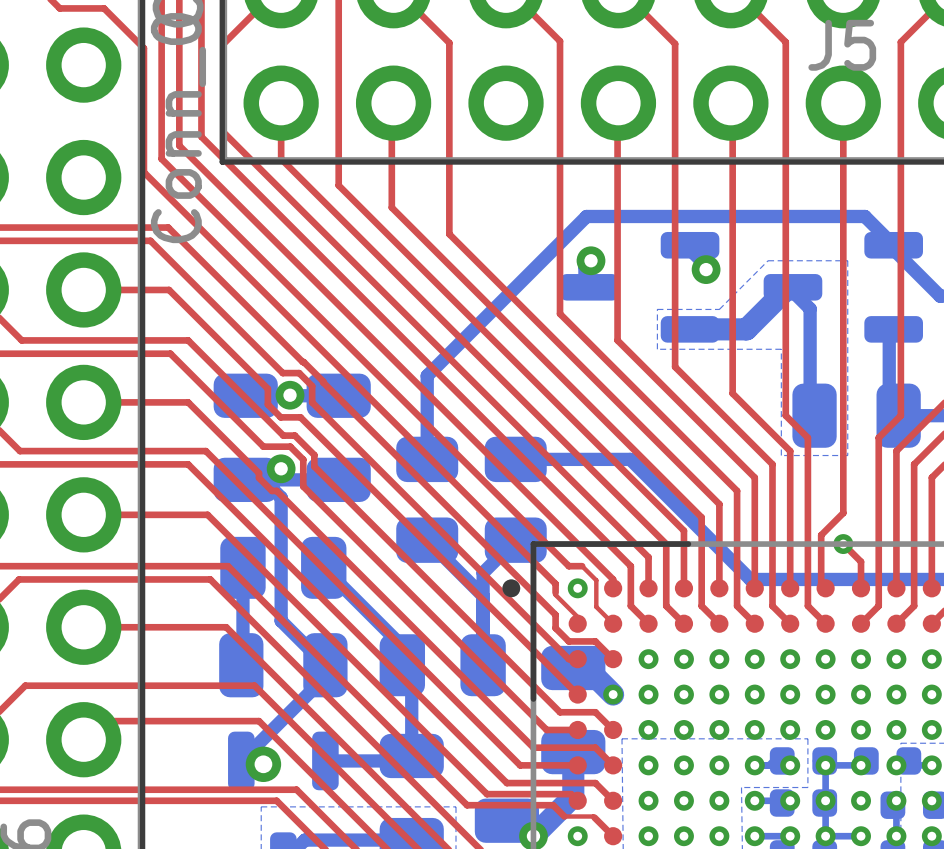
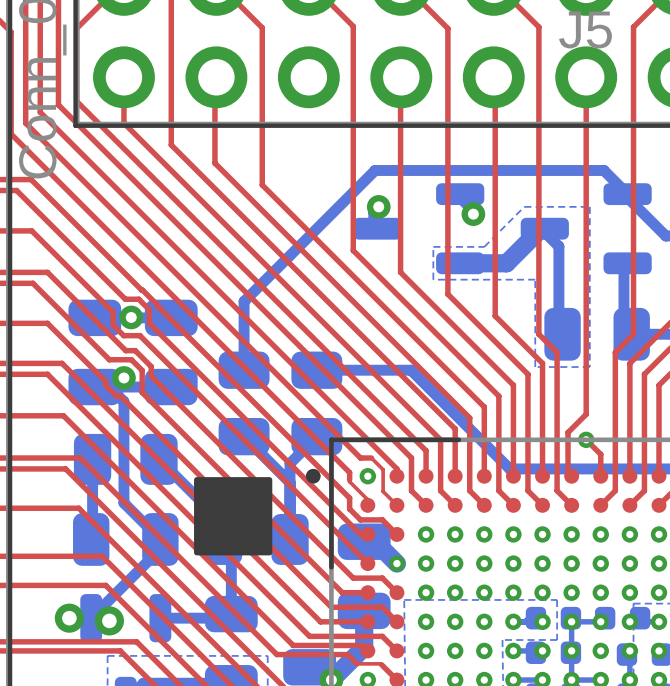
drawing: none -> [194, 477, 273, 556]
via: none -> (69, 618)

